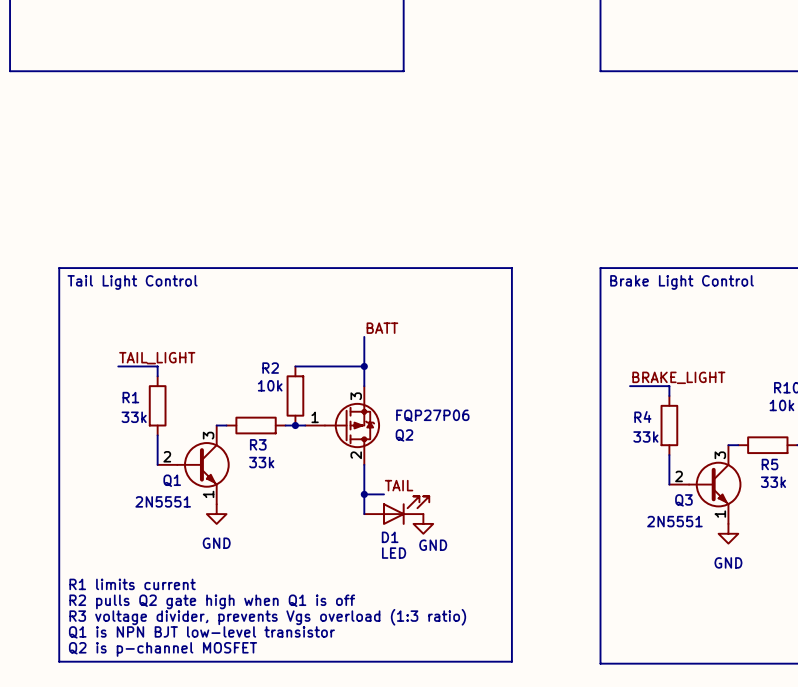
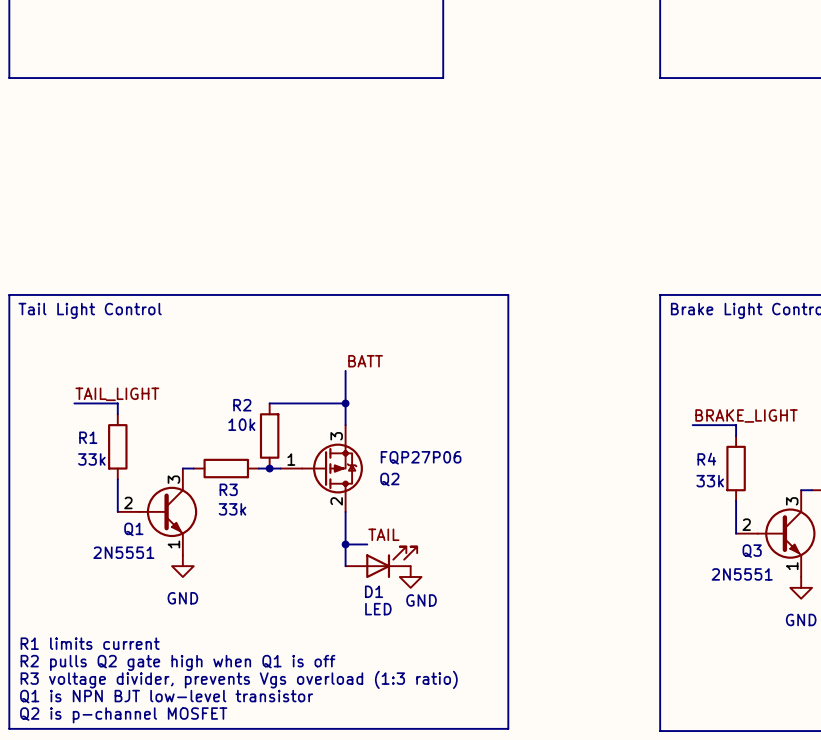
line: (59, 268) (59, 661) -> (63, 294) (9, 294) (9, 728) (63, 728)
line: (462, 268) (511, 268) (511, 661) (462, 661) -> (508, 294) (508, 728)
text position: Tail Light Control (132, 282) -> Tail Light Control (90, 310)
label position: BATT (382, 328) -> BATT (365, 361)
wire: (364, 336) (364, 386) -> (345, 370) (345, 425)
label position: TAIL_LIGHT (157, 358) -> TAIL_LIGHT (117, 394)
wire: (118, 366) (157, 366) (157, 376) -> (74, 403) (117, 403) (117, 414)
wire: (315, 366) (364, 366) -> (269, 403) (323, 403)
junction: none -> (345, 403)
junction: (364, 366) -> none
R2 position: (295, 395) -> (269, 435)
R1 position: (157, 405) -> (117, 446)
wire: (216, 425) (226, 425) -> (182, 468) (193, 468)
junction: none -> (269, 468)
R3 position: (256, 425) -> (226, 468)
junction: (295, 425) -> none
Q2 position: (342, 425) -> (321, 468)
wire: (157, 435) (157, 464) -> (117, 479) (117, 511)
Q1 position: (193, 464) -> (157, 511)
wire: (364, 464) (364, 514) -> (345, 511) (345, 566)
label position: TAIL (399, 485) -> TAIL (383, 534)
junction: none -> (345, 544)
wire: (364, 494) (384, 494) -> (345, 544) (367, 544)
junction: (364, 494) -> none
D1 position: (396, 510) -> (381, 562)
power symbol position: GND (216, 514) -> GND (182, 566)
power symbol position: GND (423, 523) -> GND (410, 577)
text position: R1 limits current (132, 584) -> R1 limits current (90, 643)
text position: R2 pulls Q2 gate high when Q1 is off (212, 601) -> R2 pulls Q2 gate high when Q1 is off (177, 662)
text position: R3 voltage divider, prevents Vgs overload (1:3 ratio) (267, 617) -> R3 voltage divider, prevents Vgs overload (1:3 ratio) (239, 679)
text position: Q1 is NPN BJT low-level transistor (201, 632) -> Q1 is NPN BJT low-level transistor (166, 696)
text position: Q2 is p-channel MOSFET (163, 649) -> Q2 is p-channel MOSFET (123, 715)

